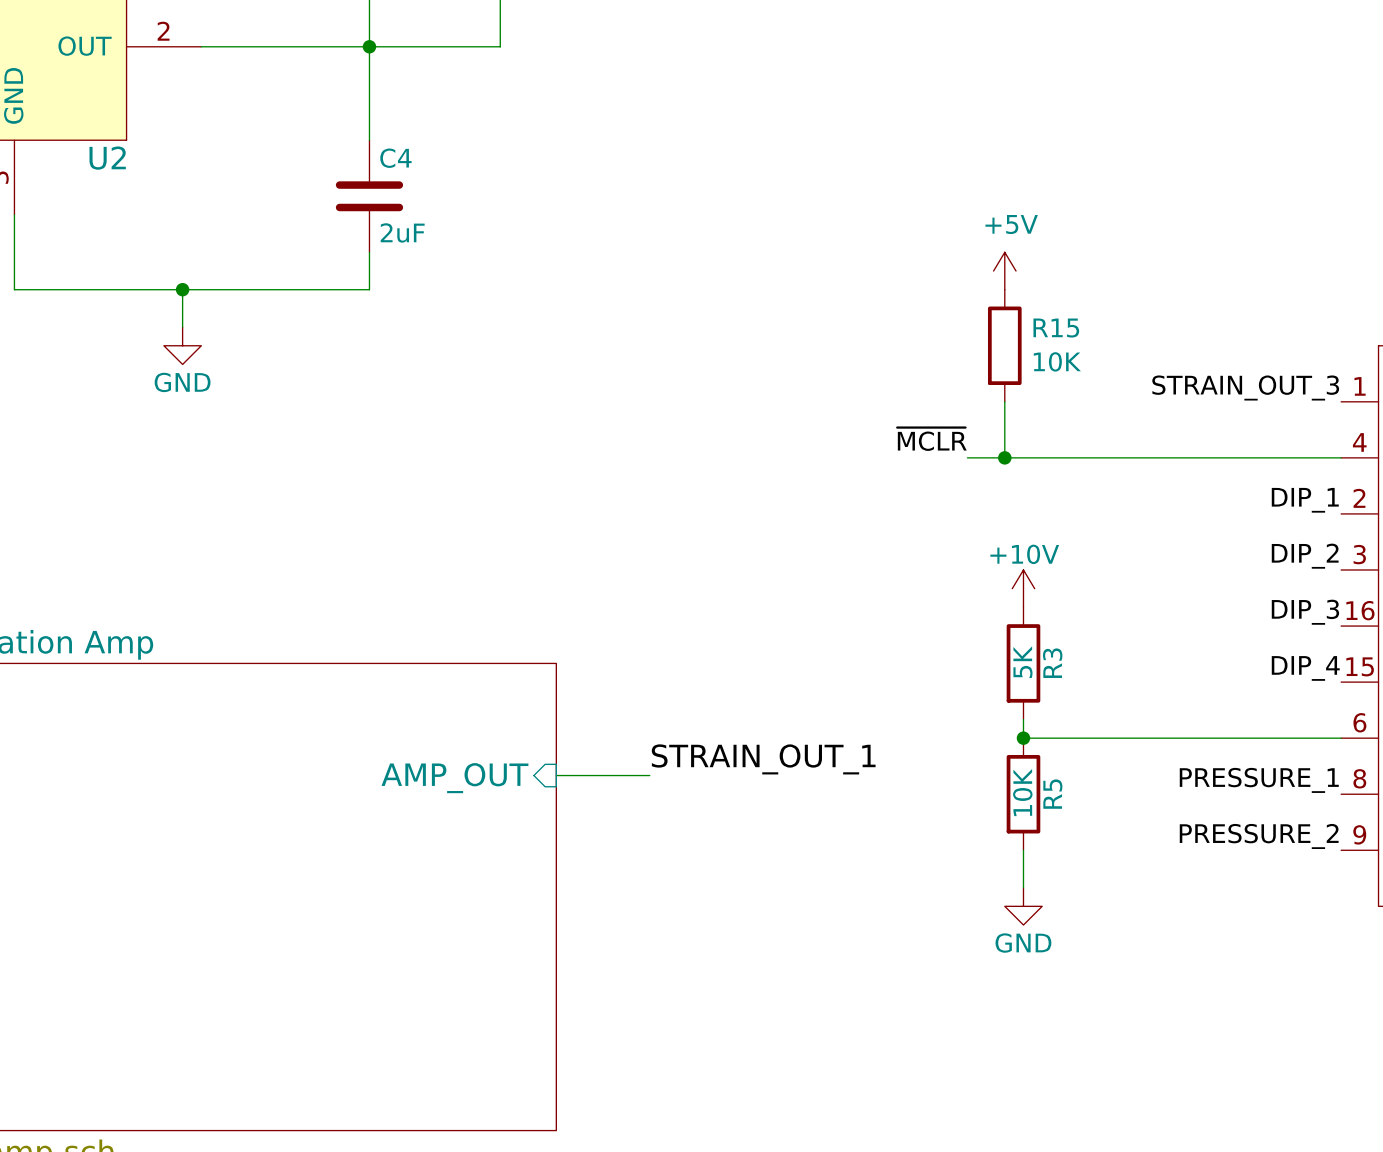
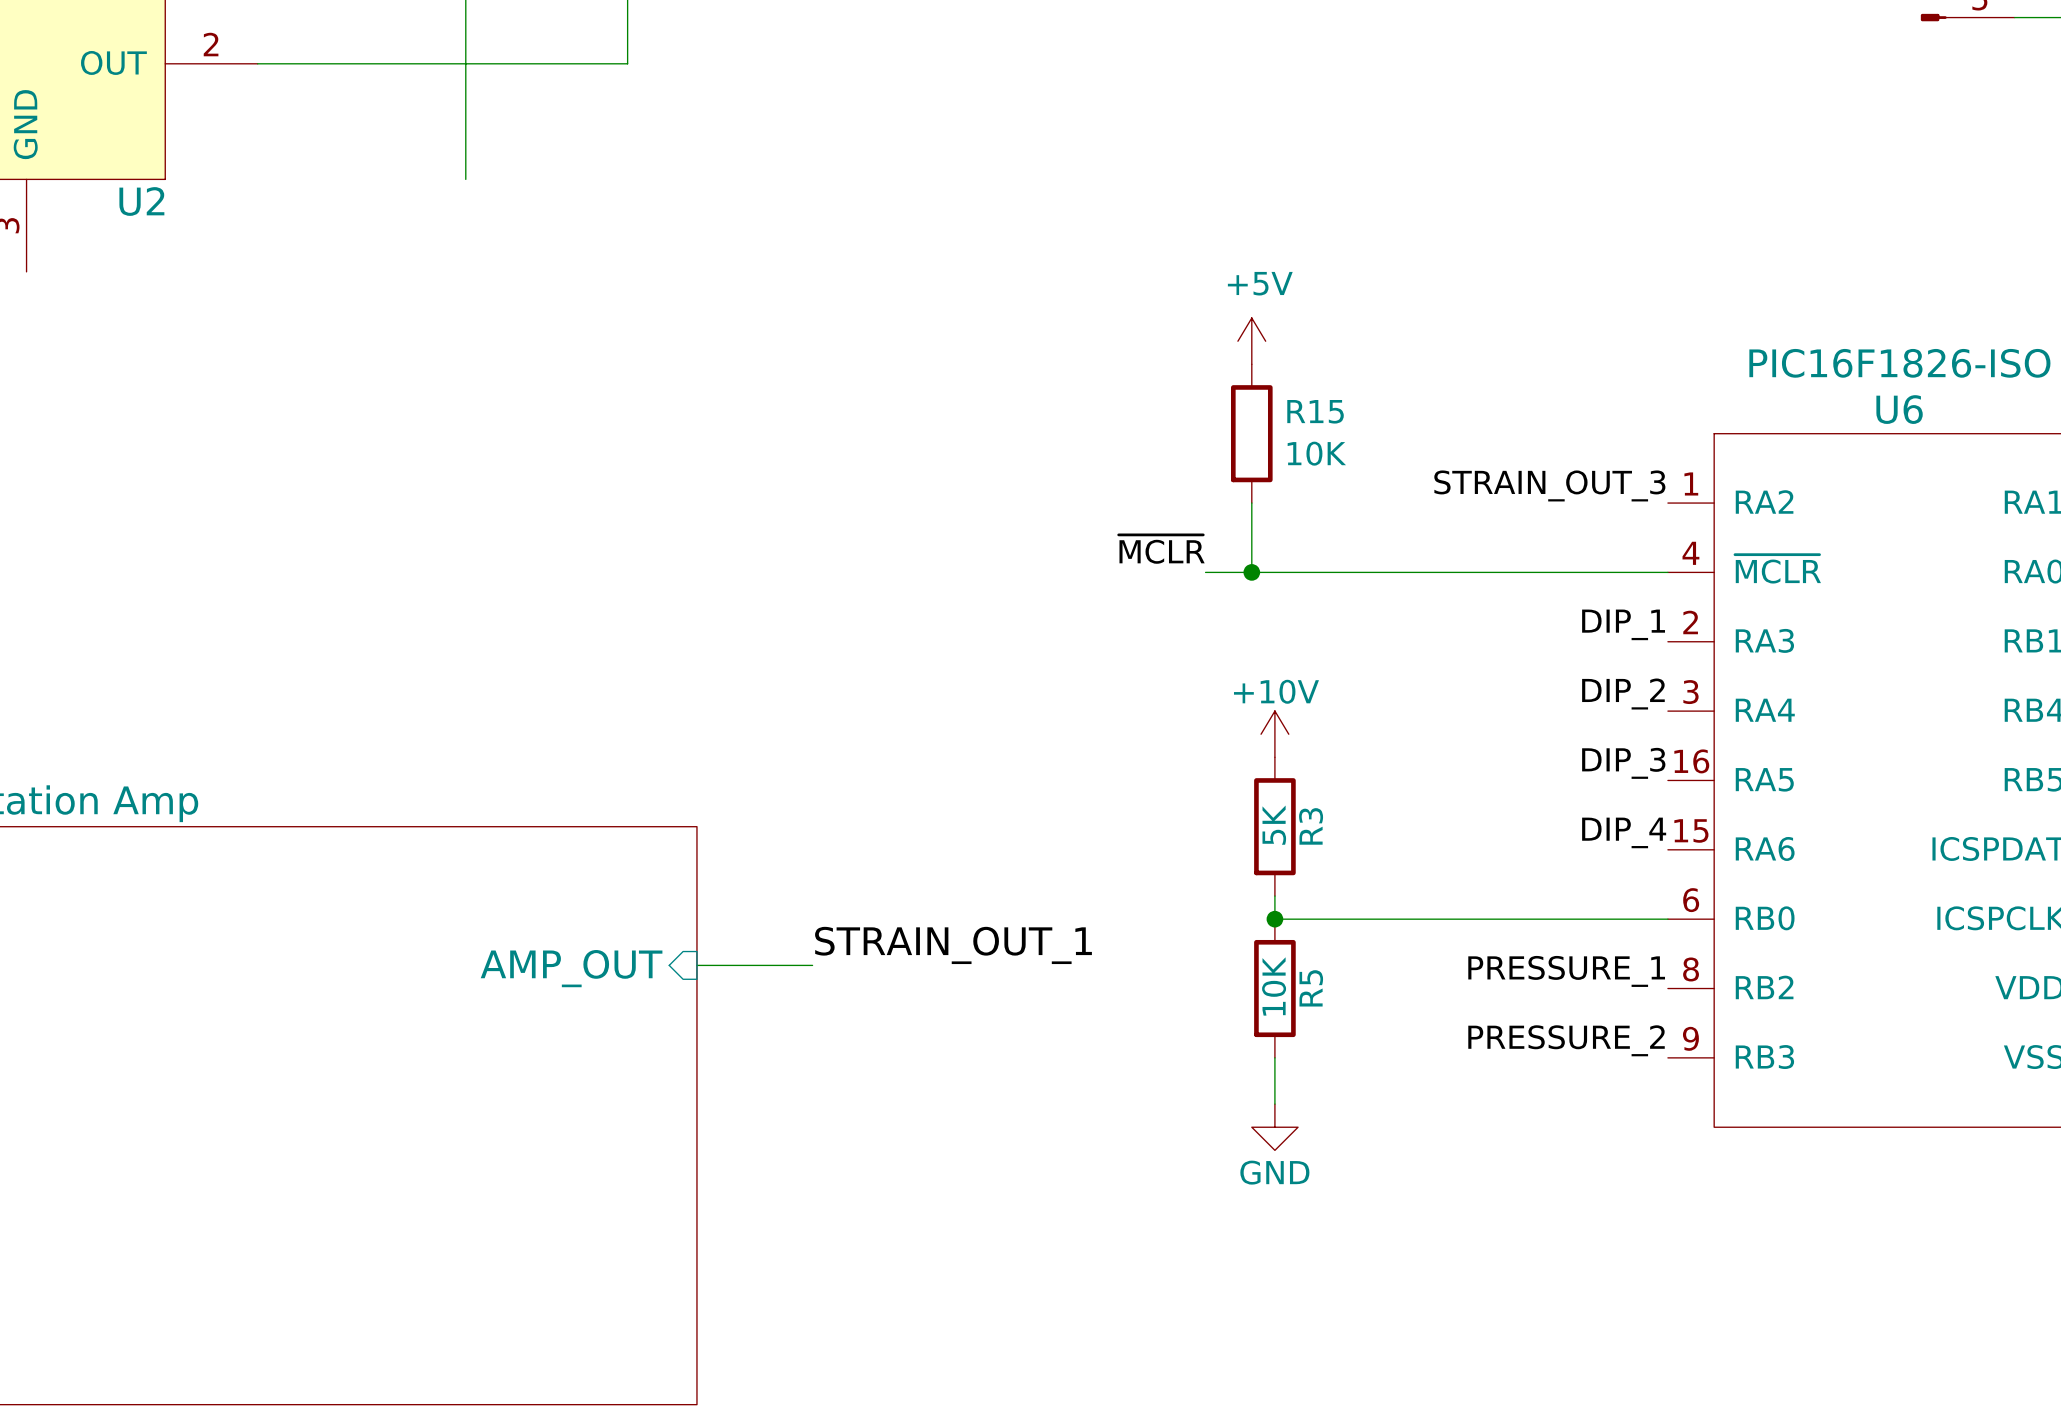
junction: (369, 46) -> none
C4: 2uF (369, 196) -> none
wire: (14, 214) (14, 289) (369, 289) (369, 252) -> none
wire: (182, 289) (182, 327) -> none
junction: (182, 289) -> none
power symbol: GND (182, 345) -> none

